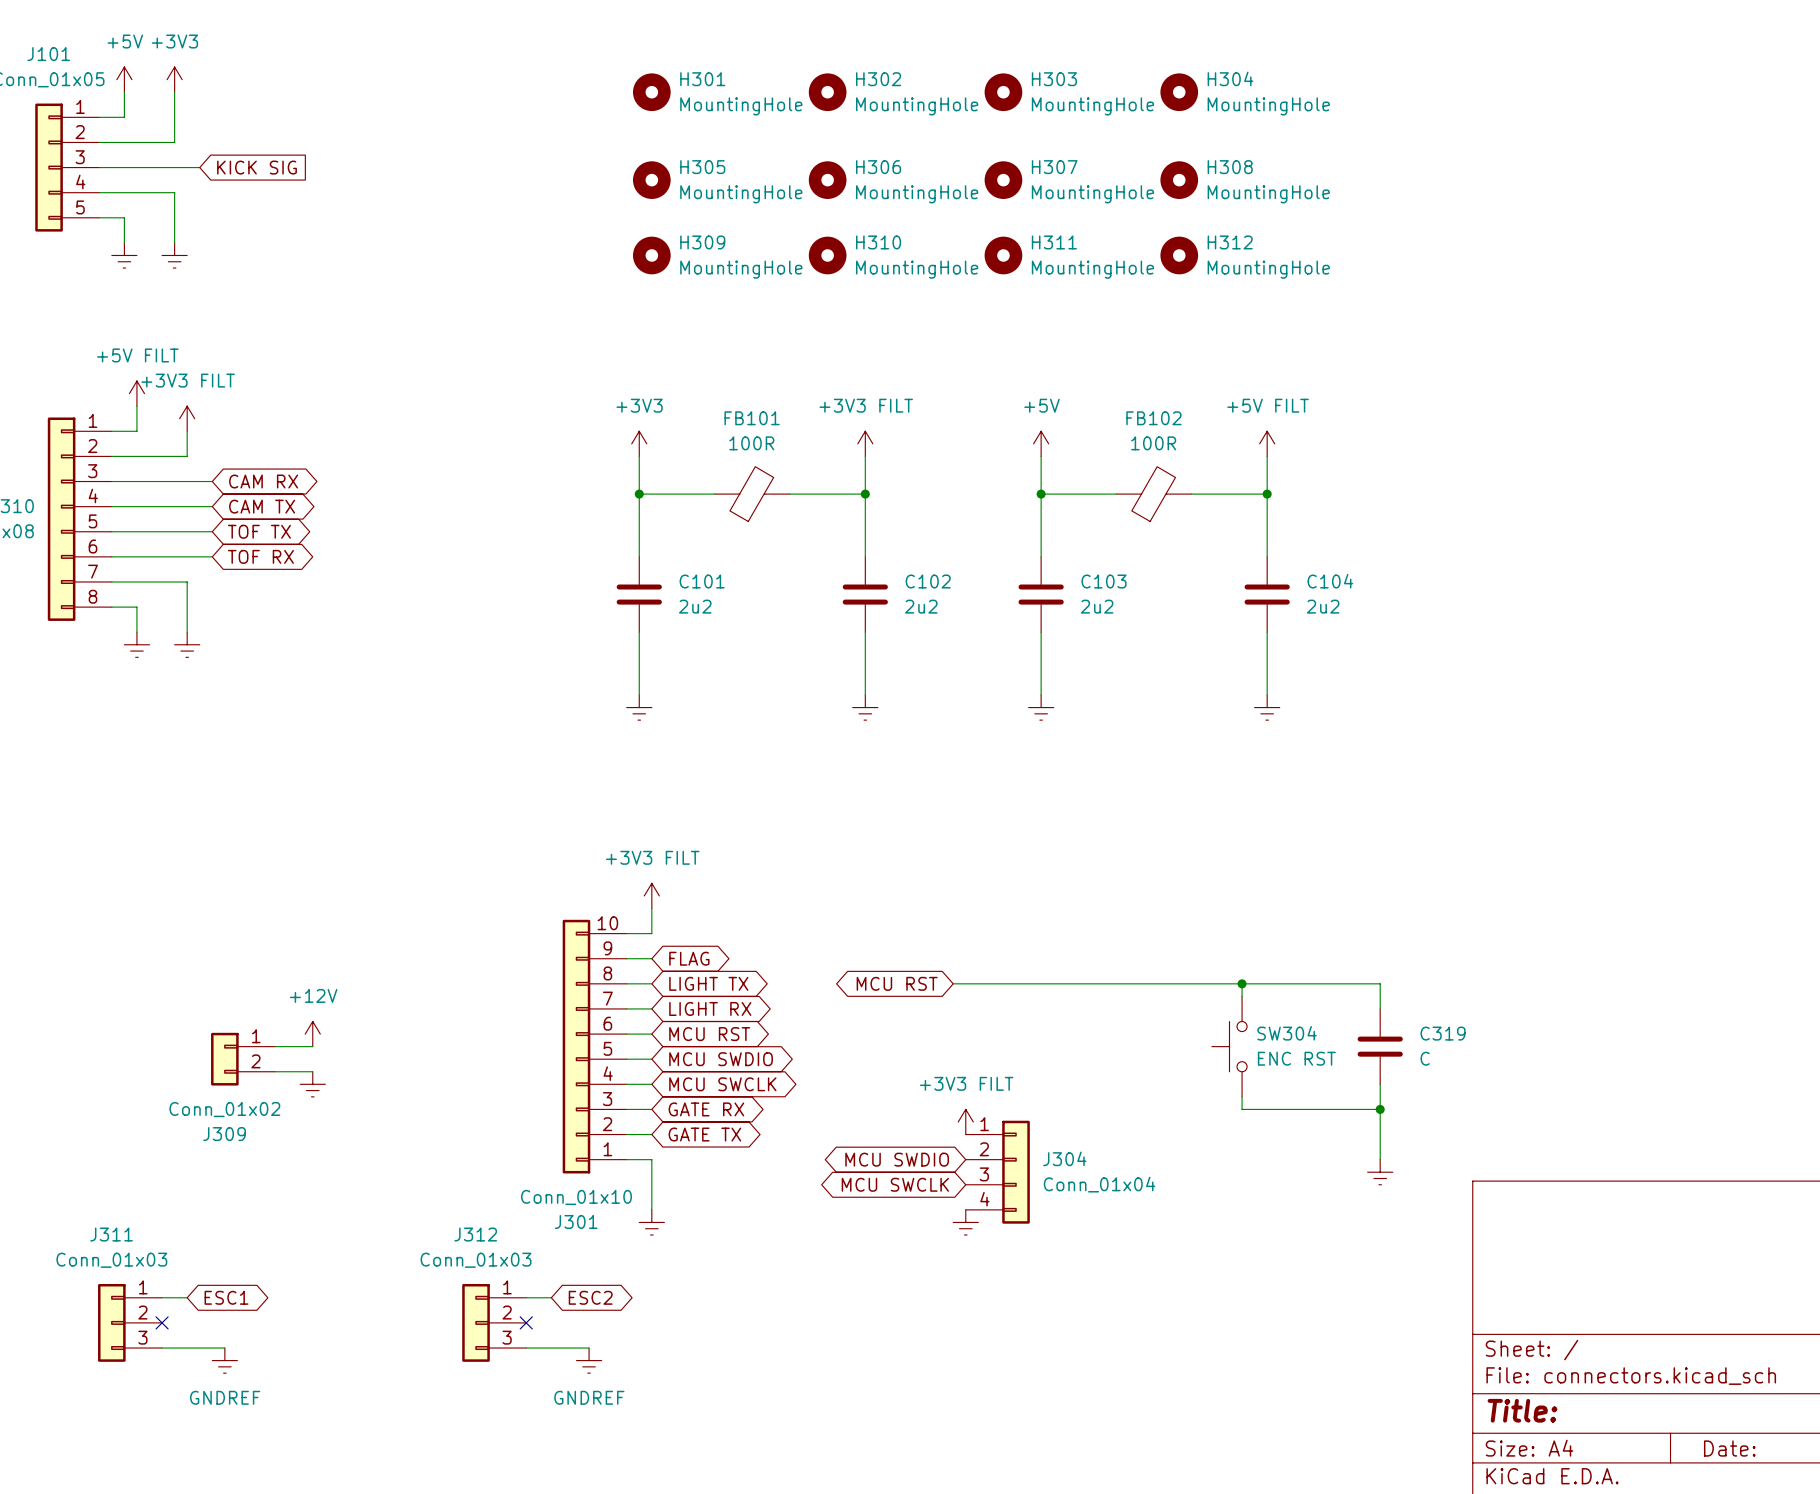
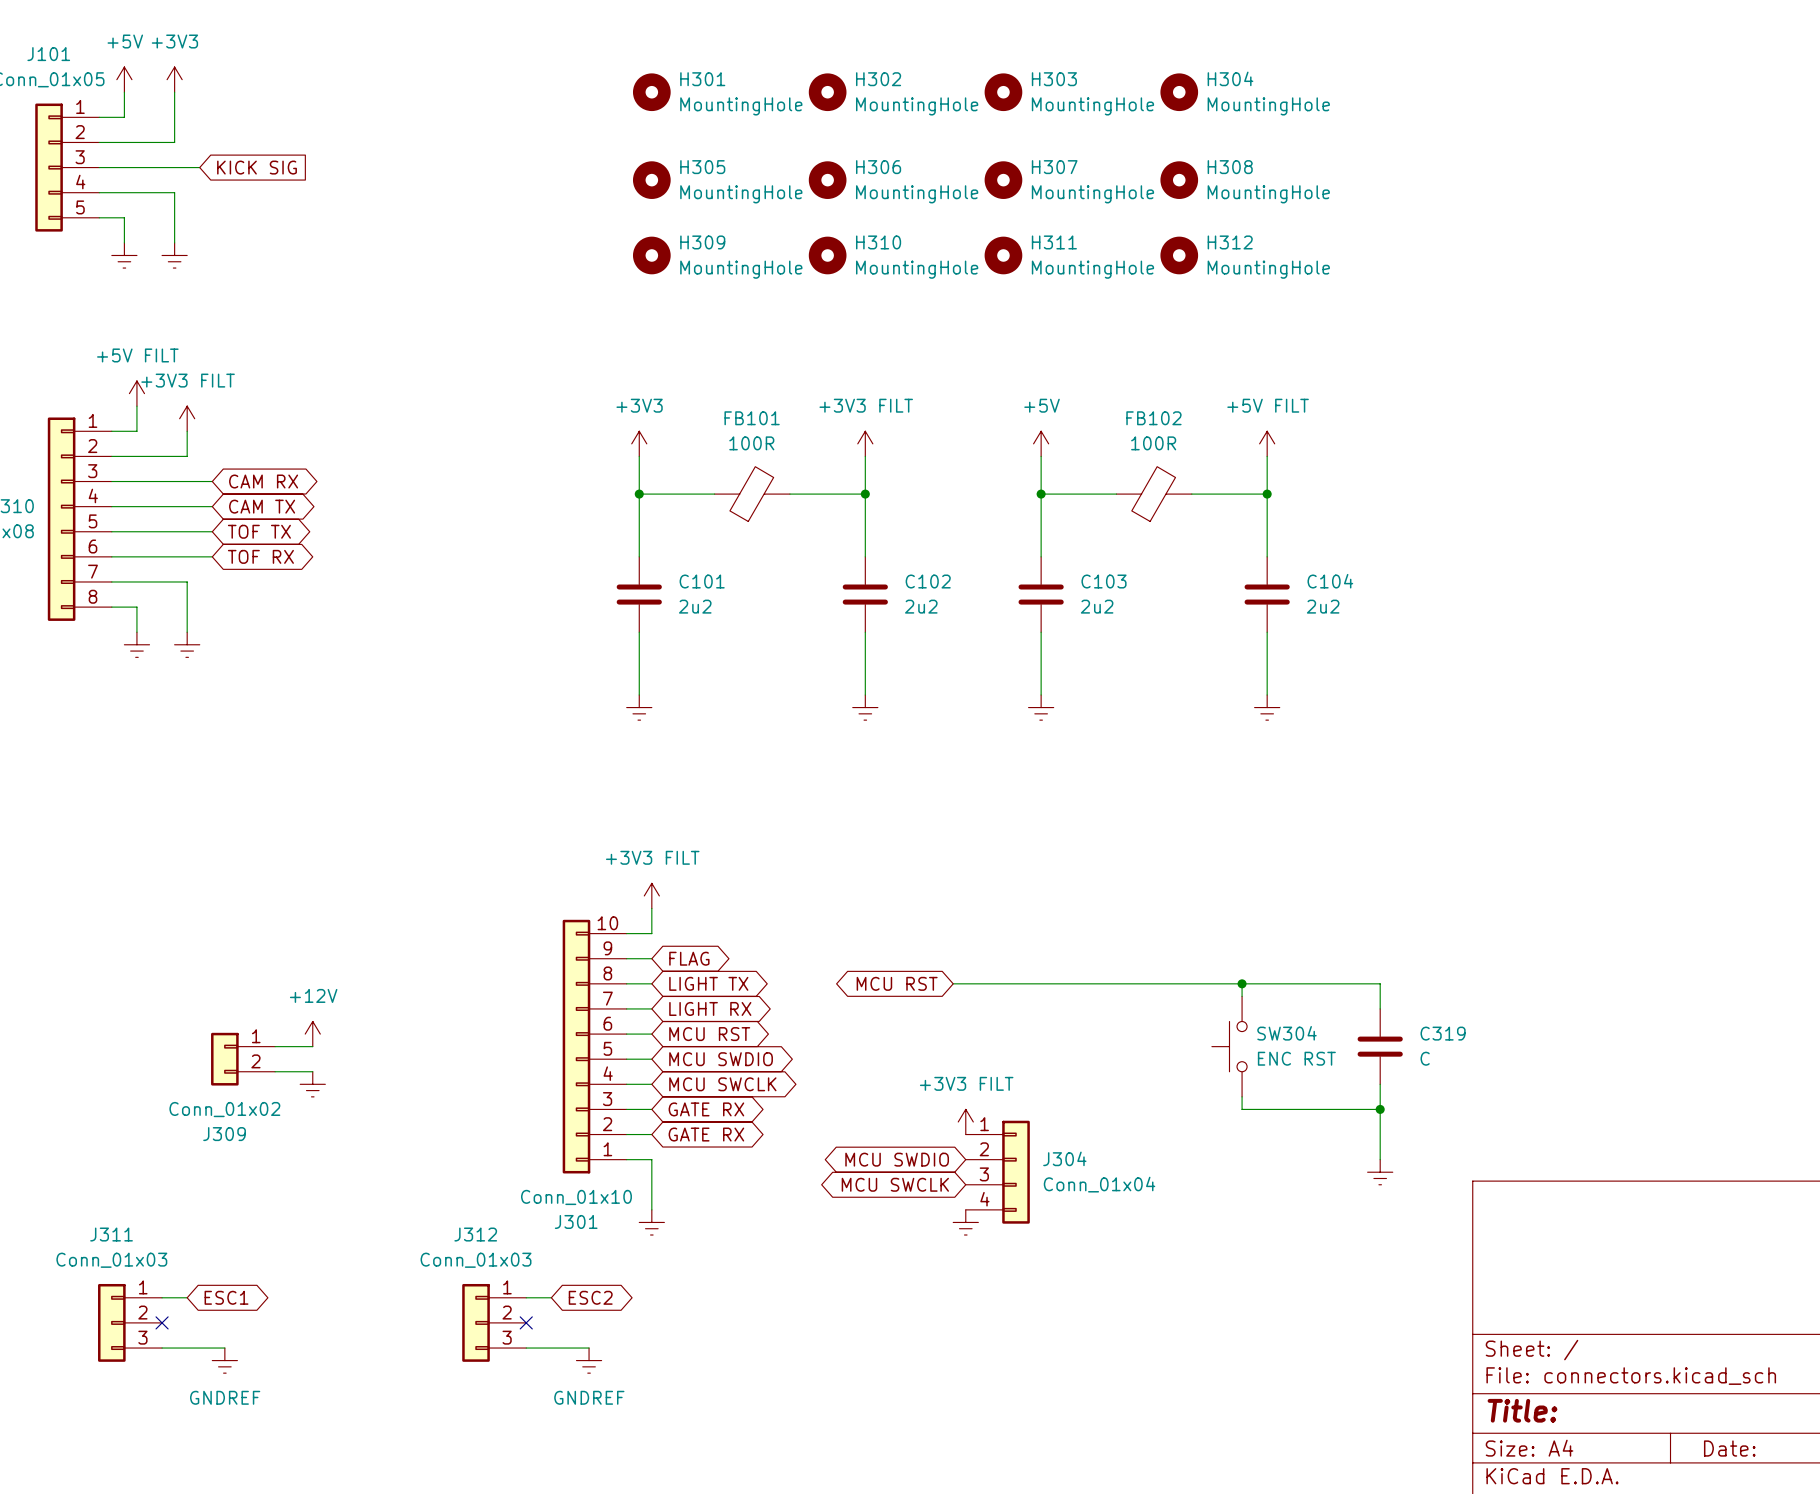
global label: GATE TX (704, 1134) -> GATE RX (706, 1134)

